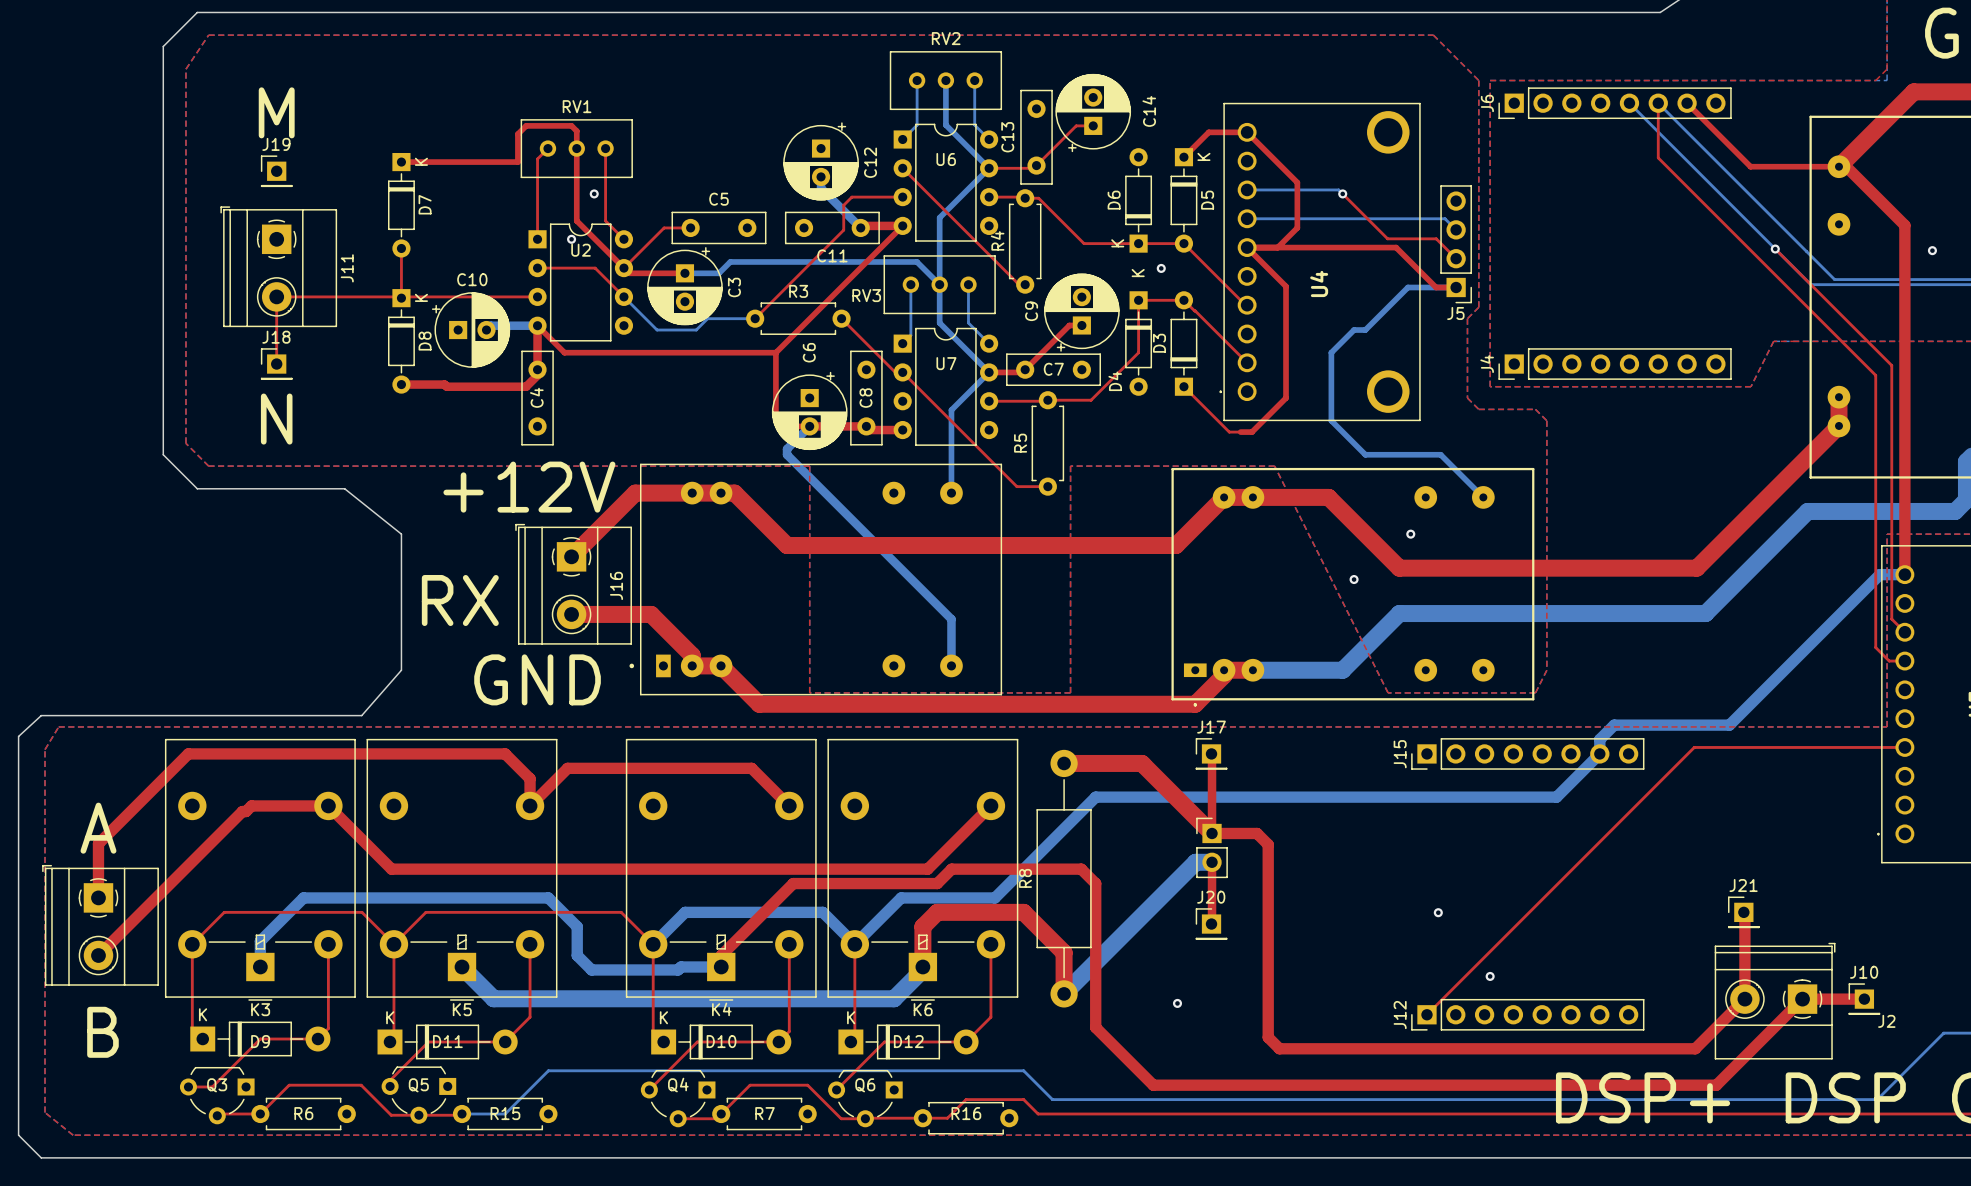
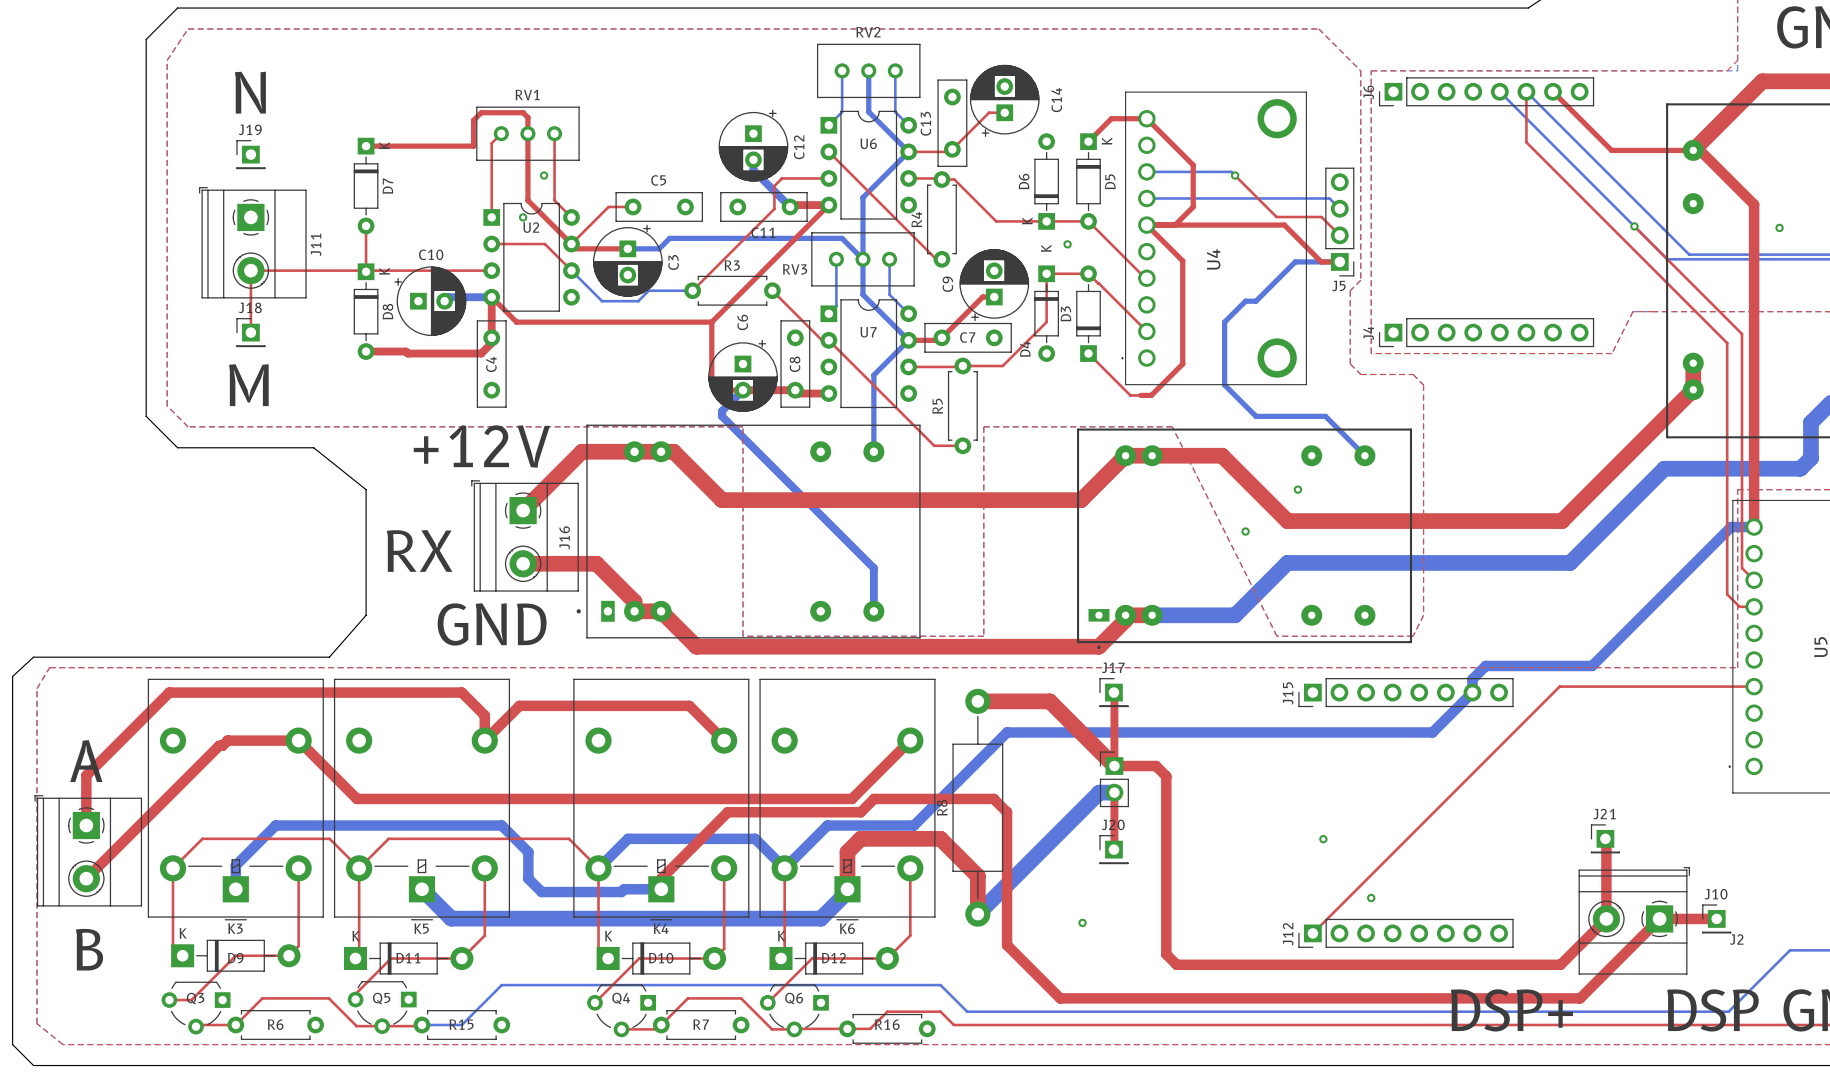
text: M (276, 112) -> N (250, 92)
text: N (276, 419) -> M (248, 385)

